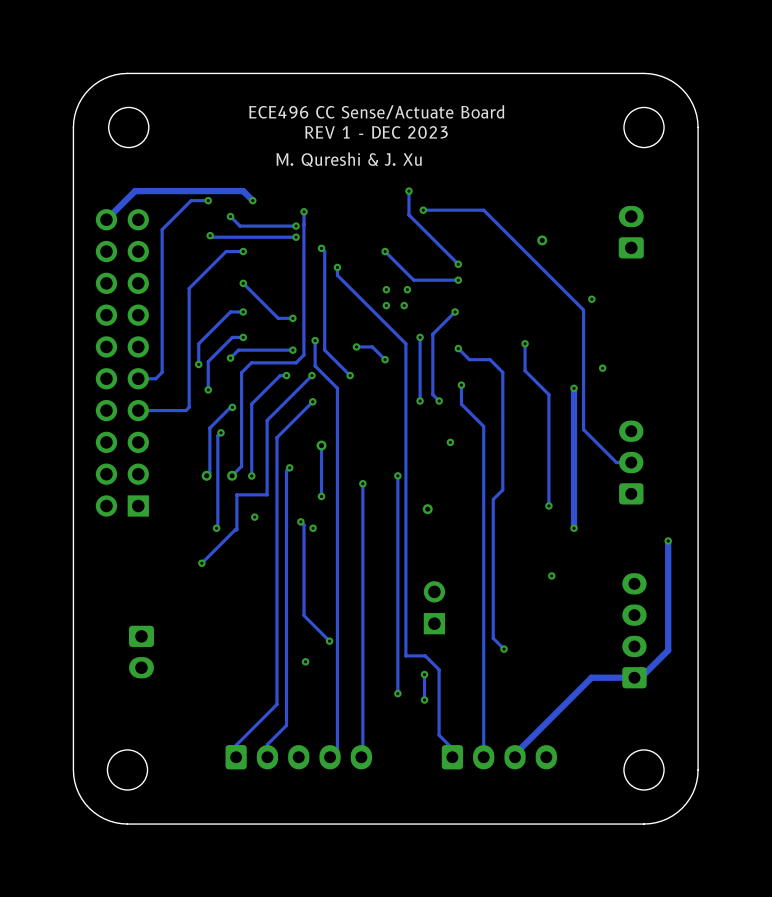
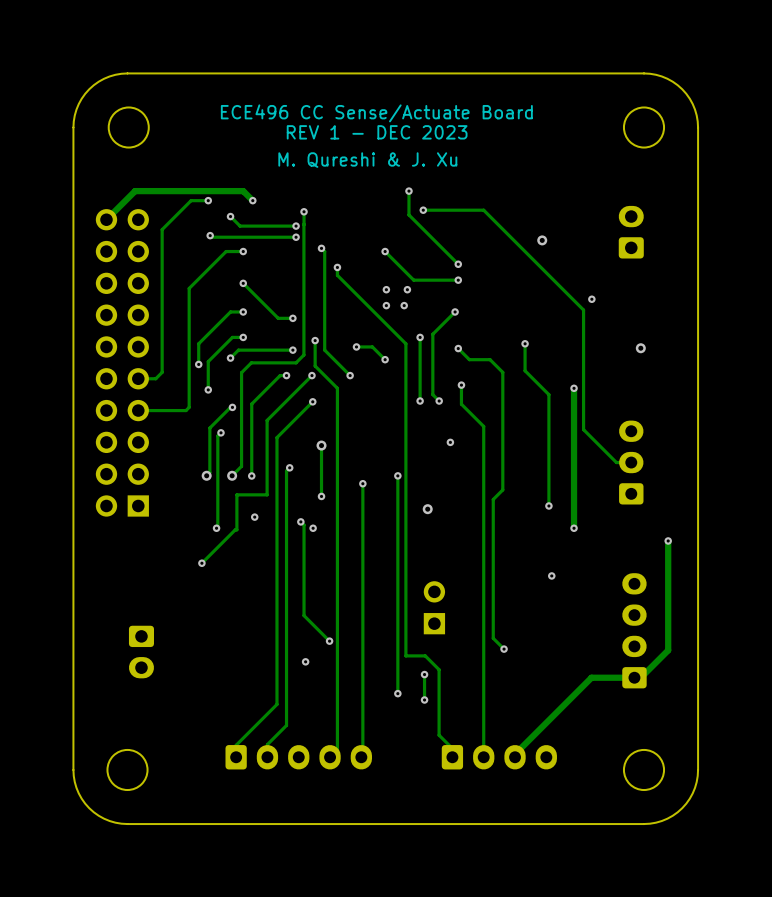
via: none -> (640, 348)
via: (602, 368) -> none

